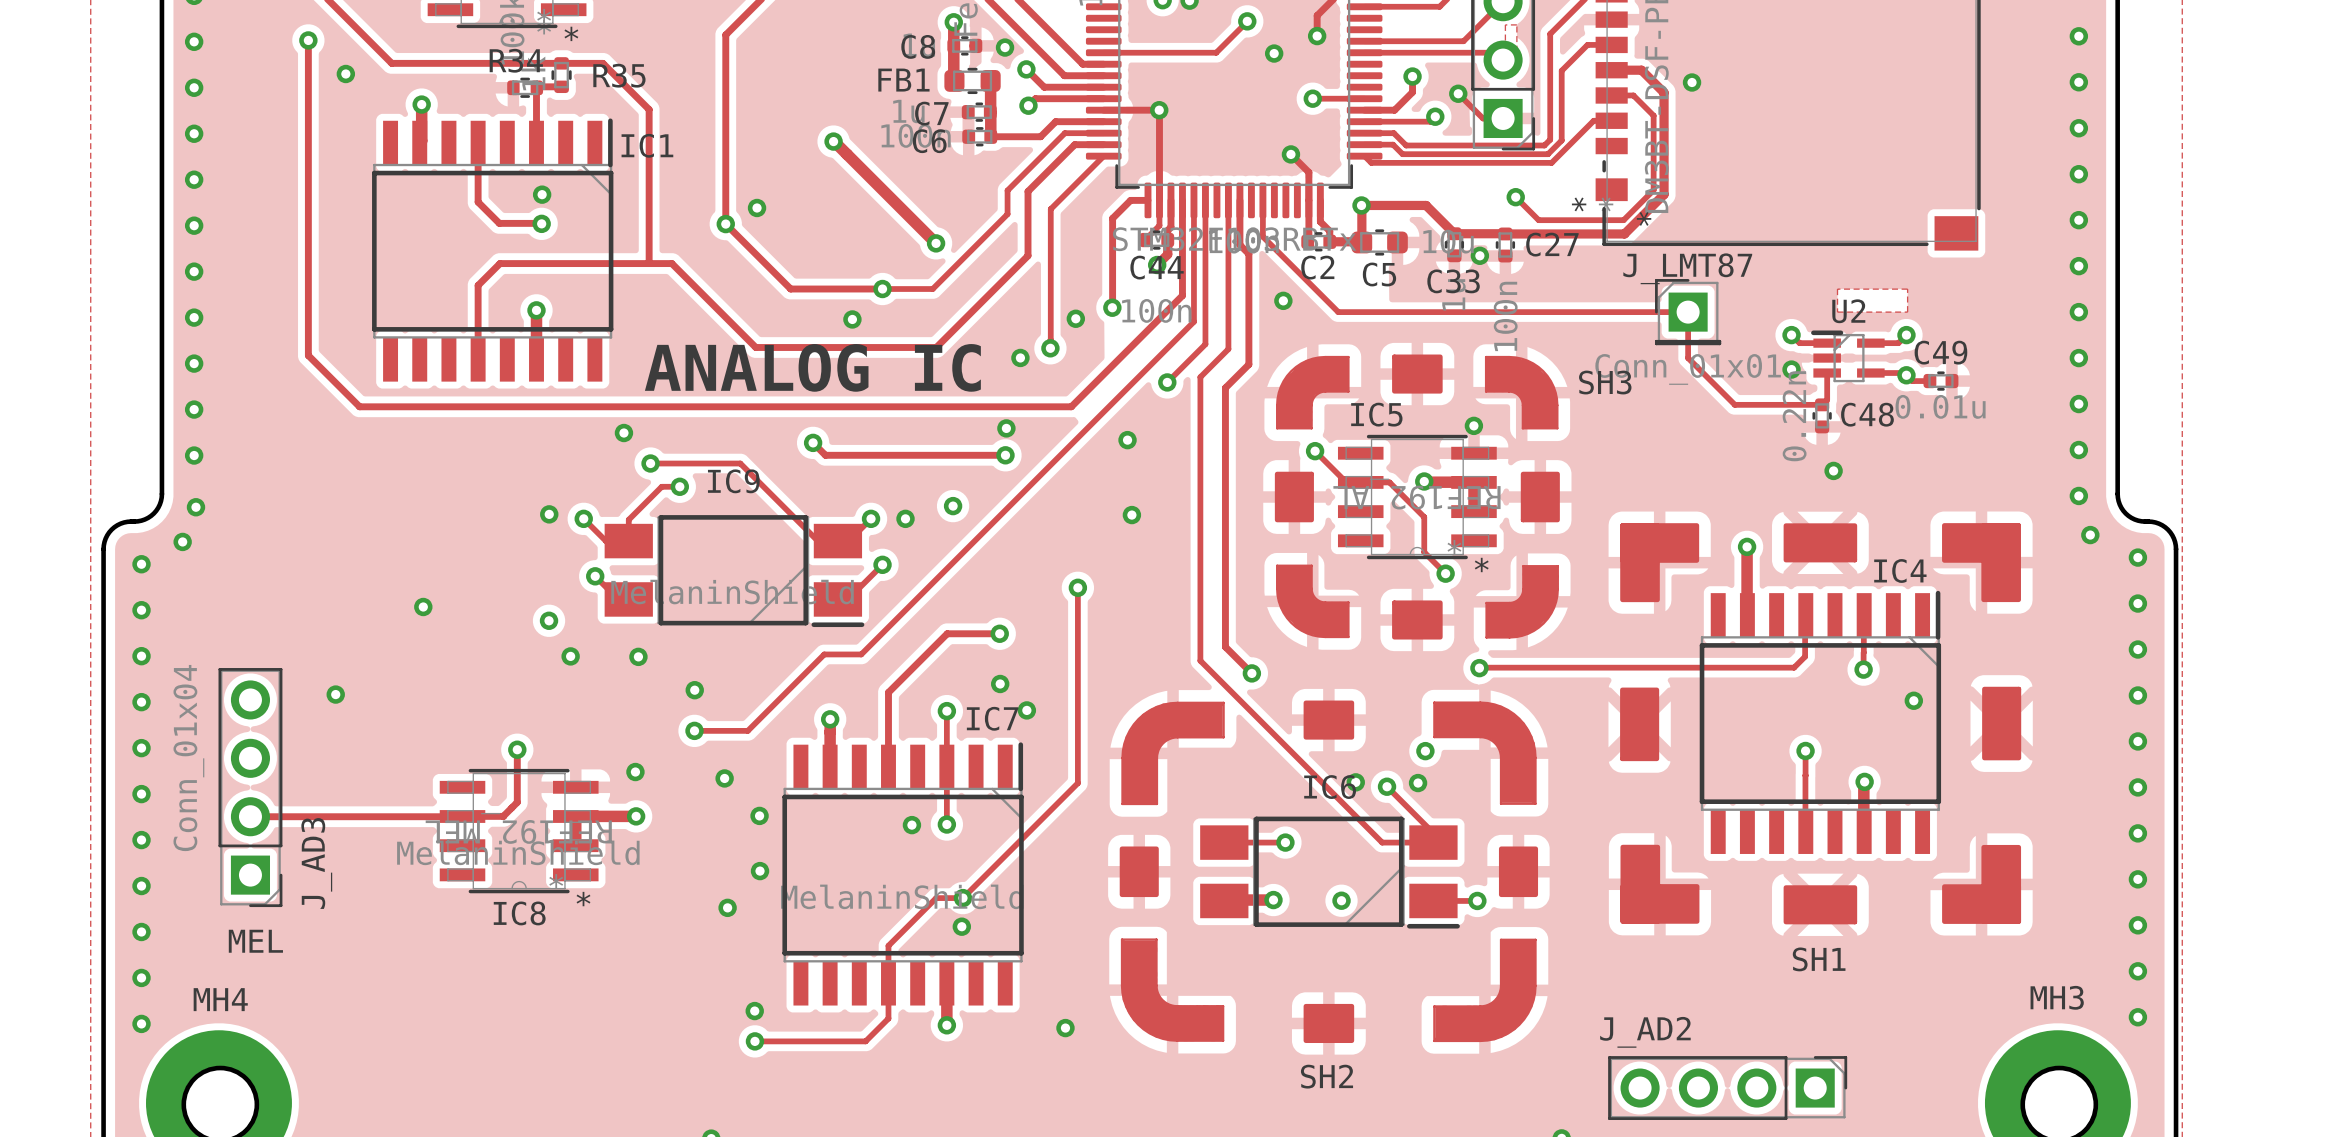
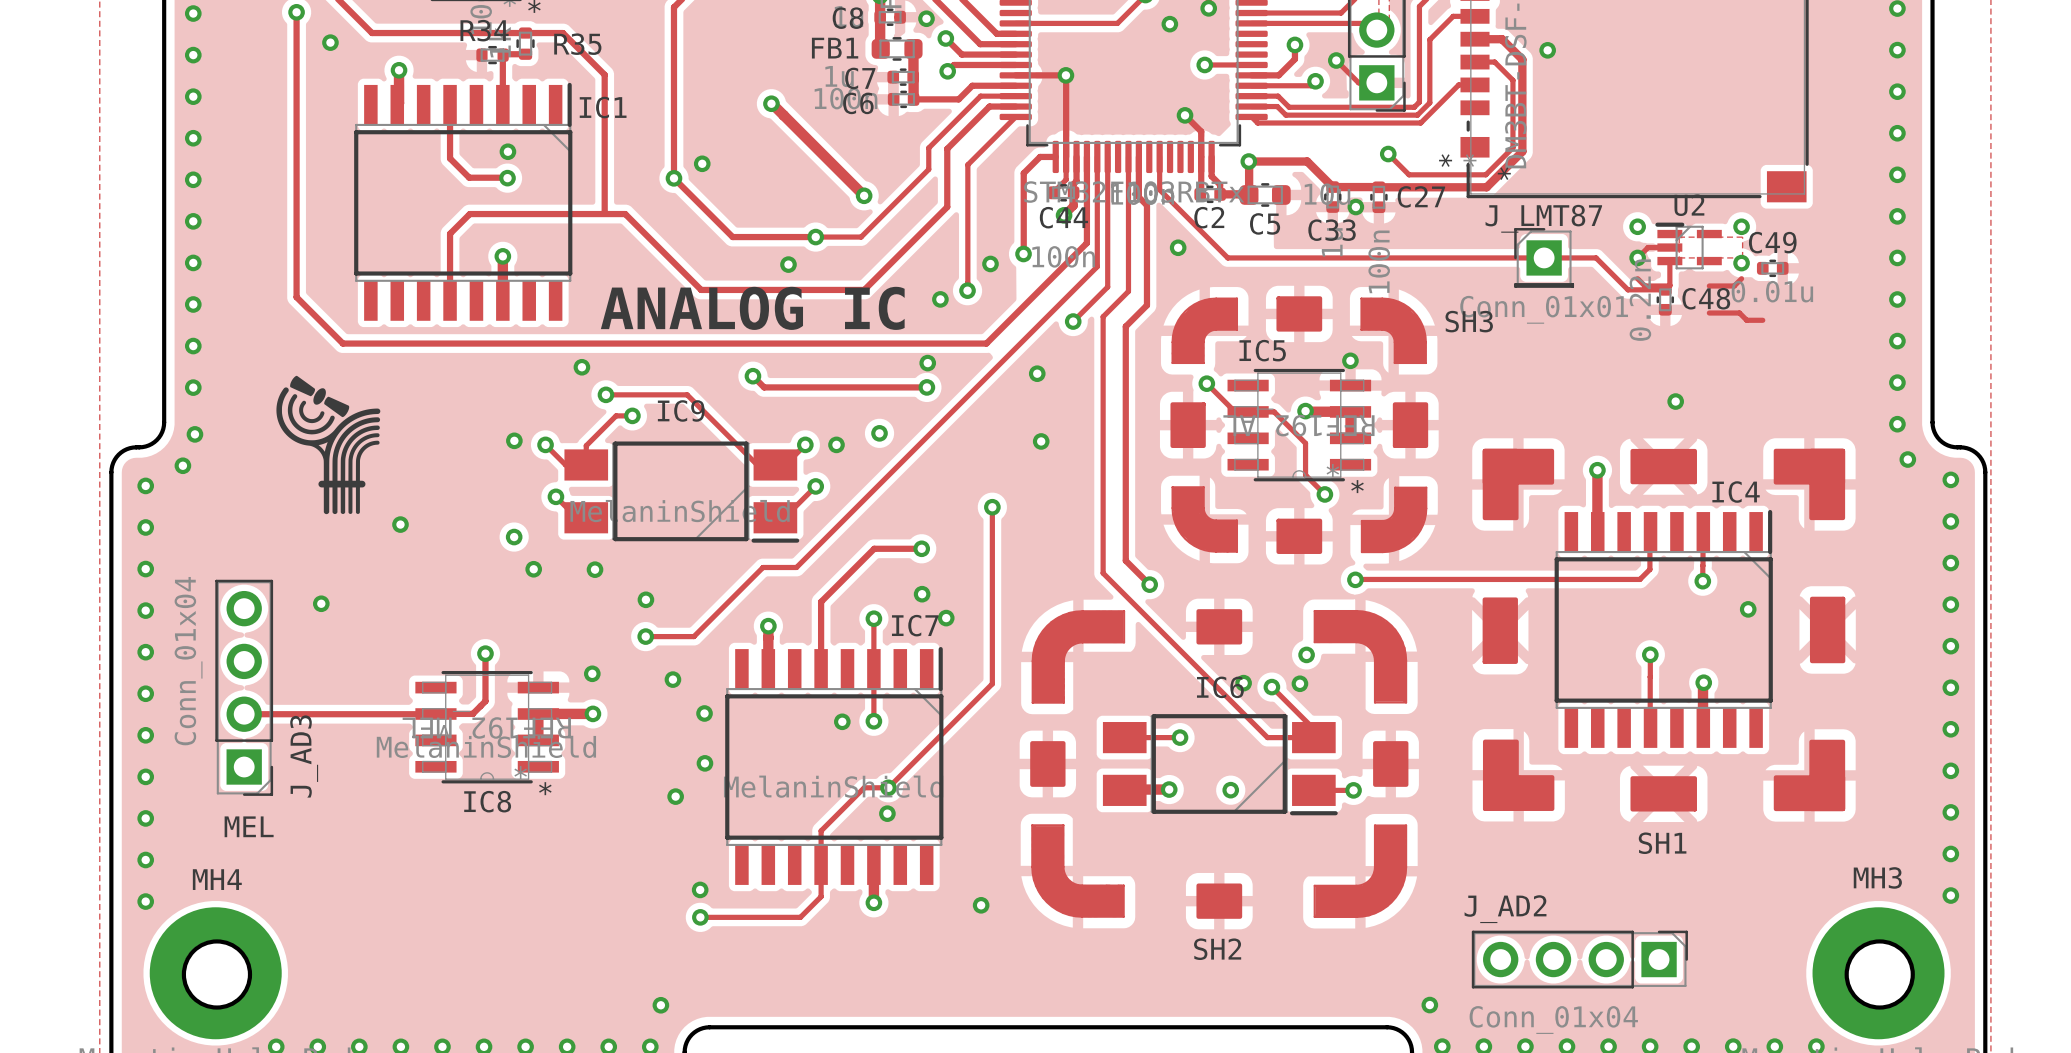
via: none -> (1637, 226)
via: none -> (1741, 226)
track: none -> (1669, 247) (1648, 247) (1637, 257)
track: (1688, 312) (1688, 358) (1734, 404) (1822, 404) (1827, 399) (1827, 373) -> (1544, 257) (1596, 257) (1627, 289) (1665, 289) (1669, 285) (1669, 261)
via position: (1791, 335) -> (1637, 257)
via position: (1906, 335) -> (1741, 263)
U2 position: (1847, 356) -> (1688, 245)
via: (1791, 369) -> none
via: (1906, 375) -> none
C49 position: (1940, 381) -> (1772, 268)
C48 position: (1822, 415) -> (1665, 299)
drawing: none -> [276, 375, 381, 515]

